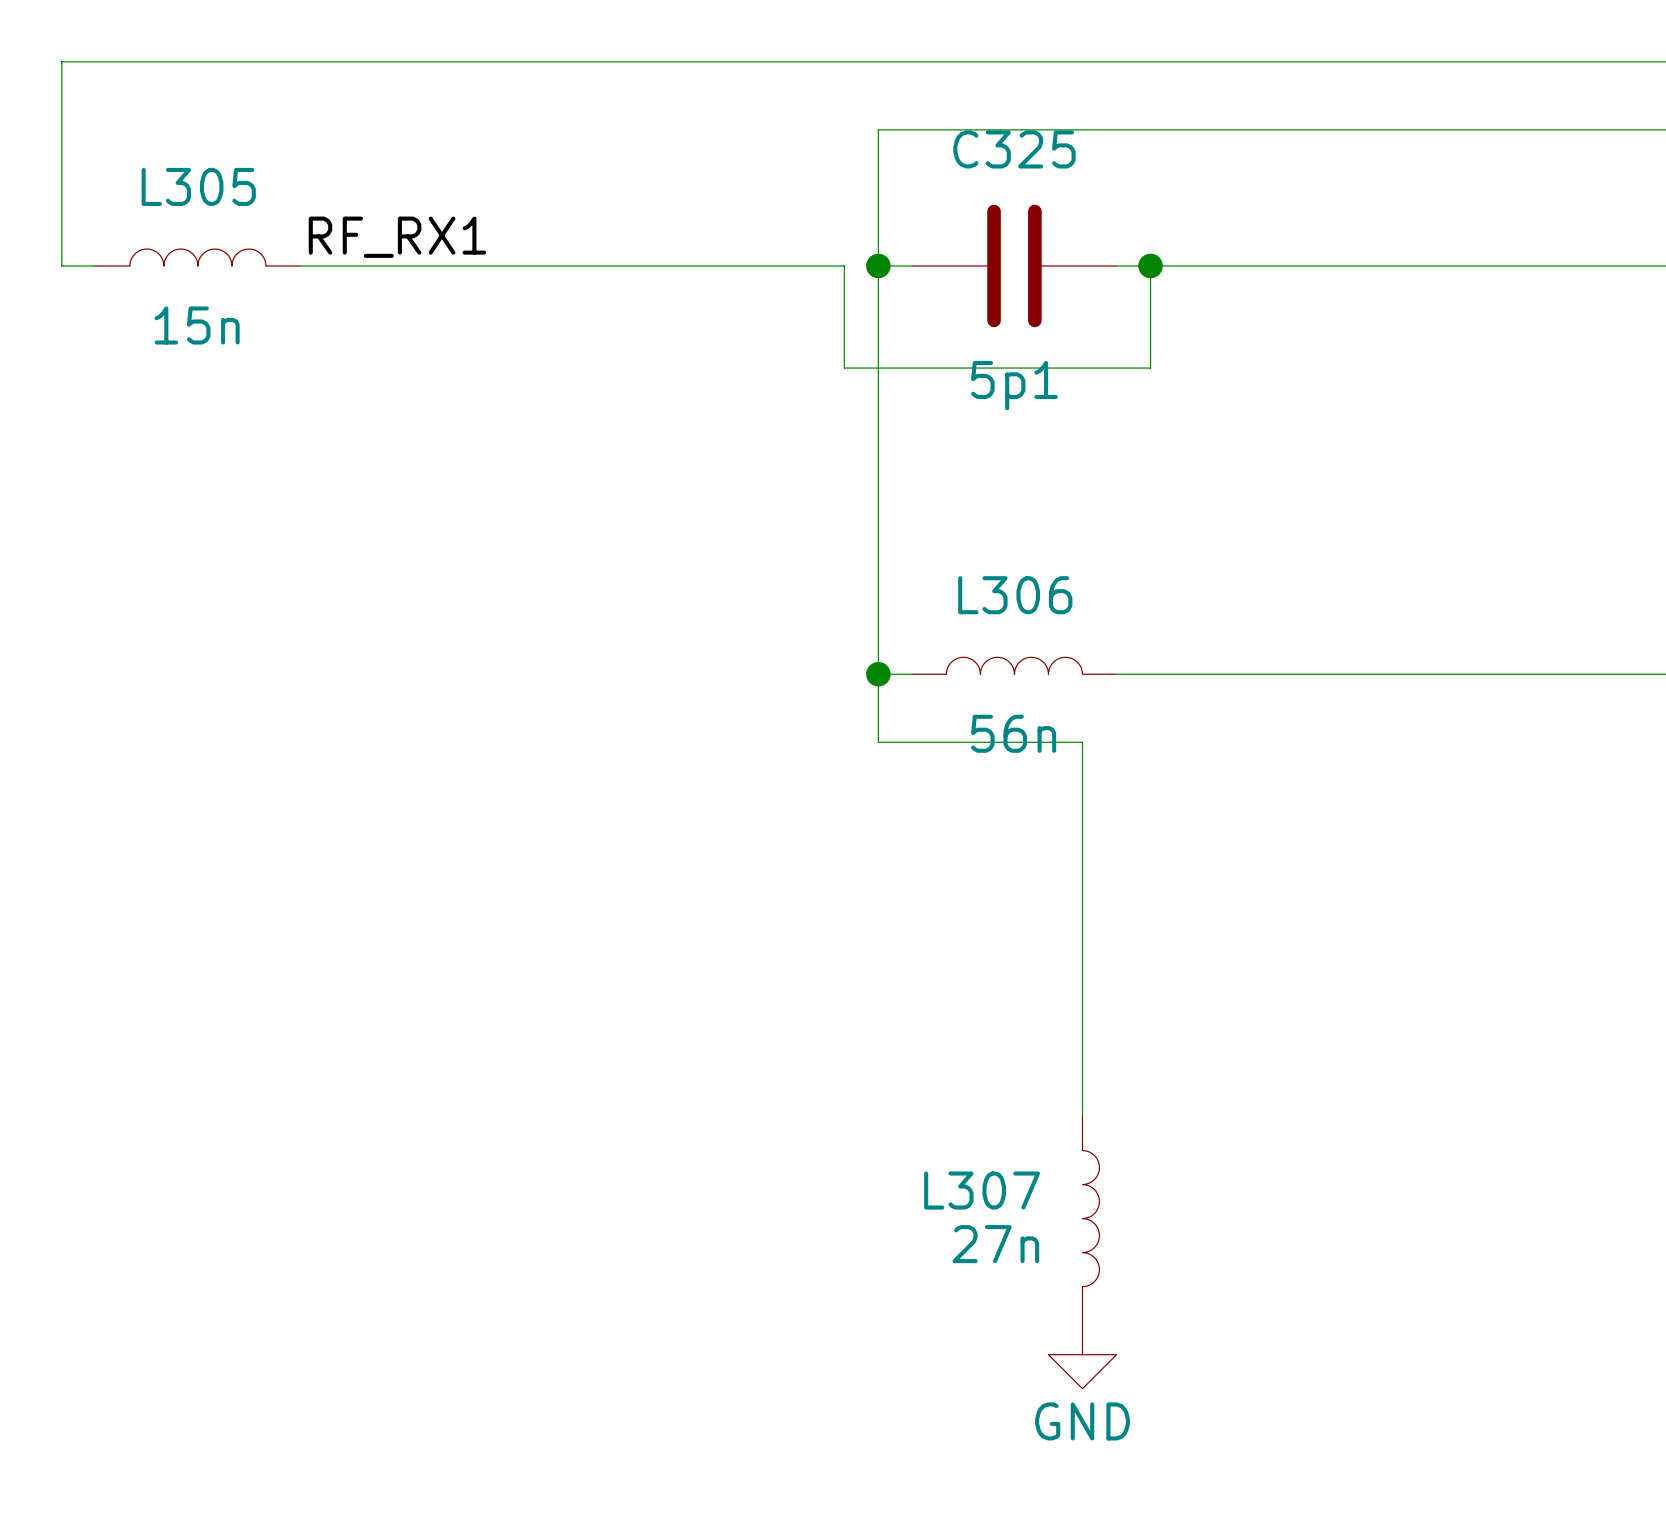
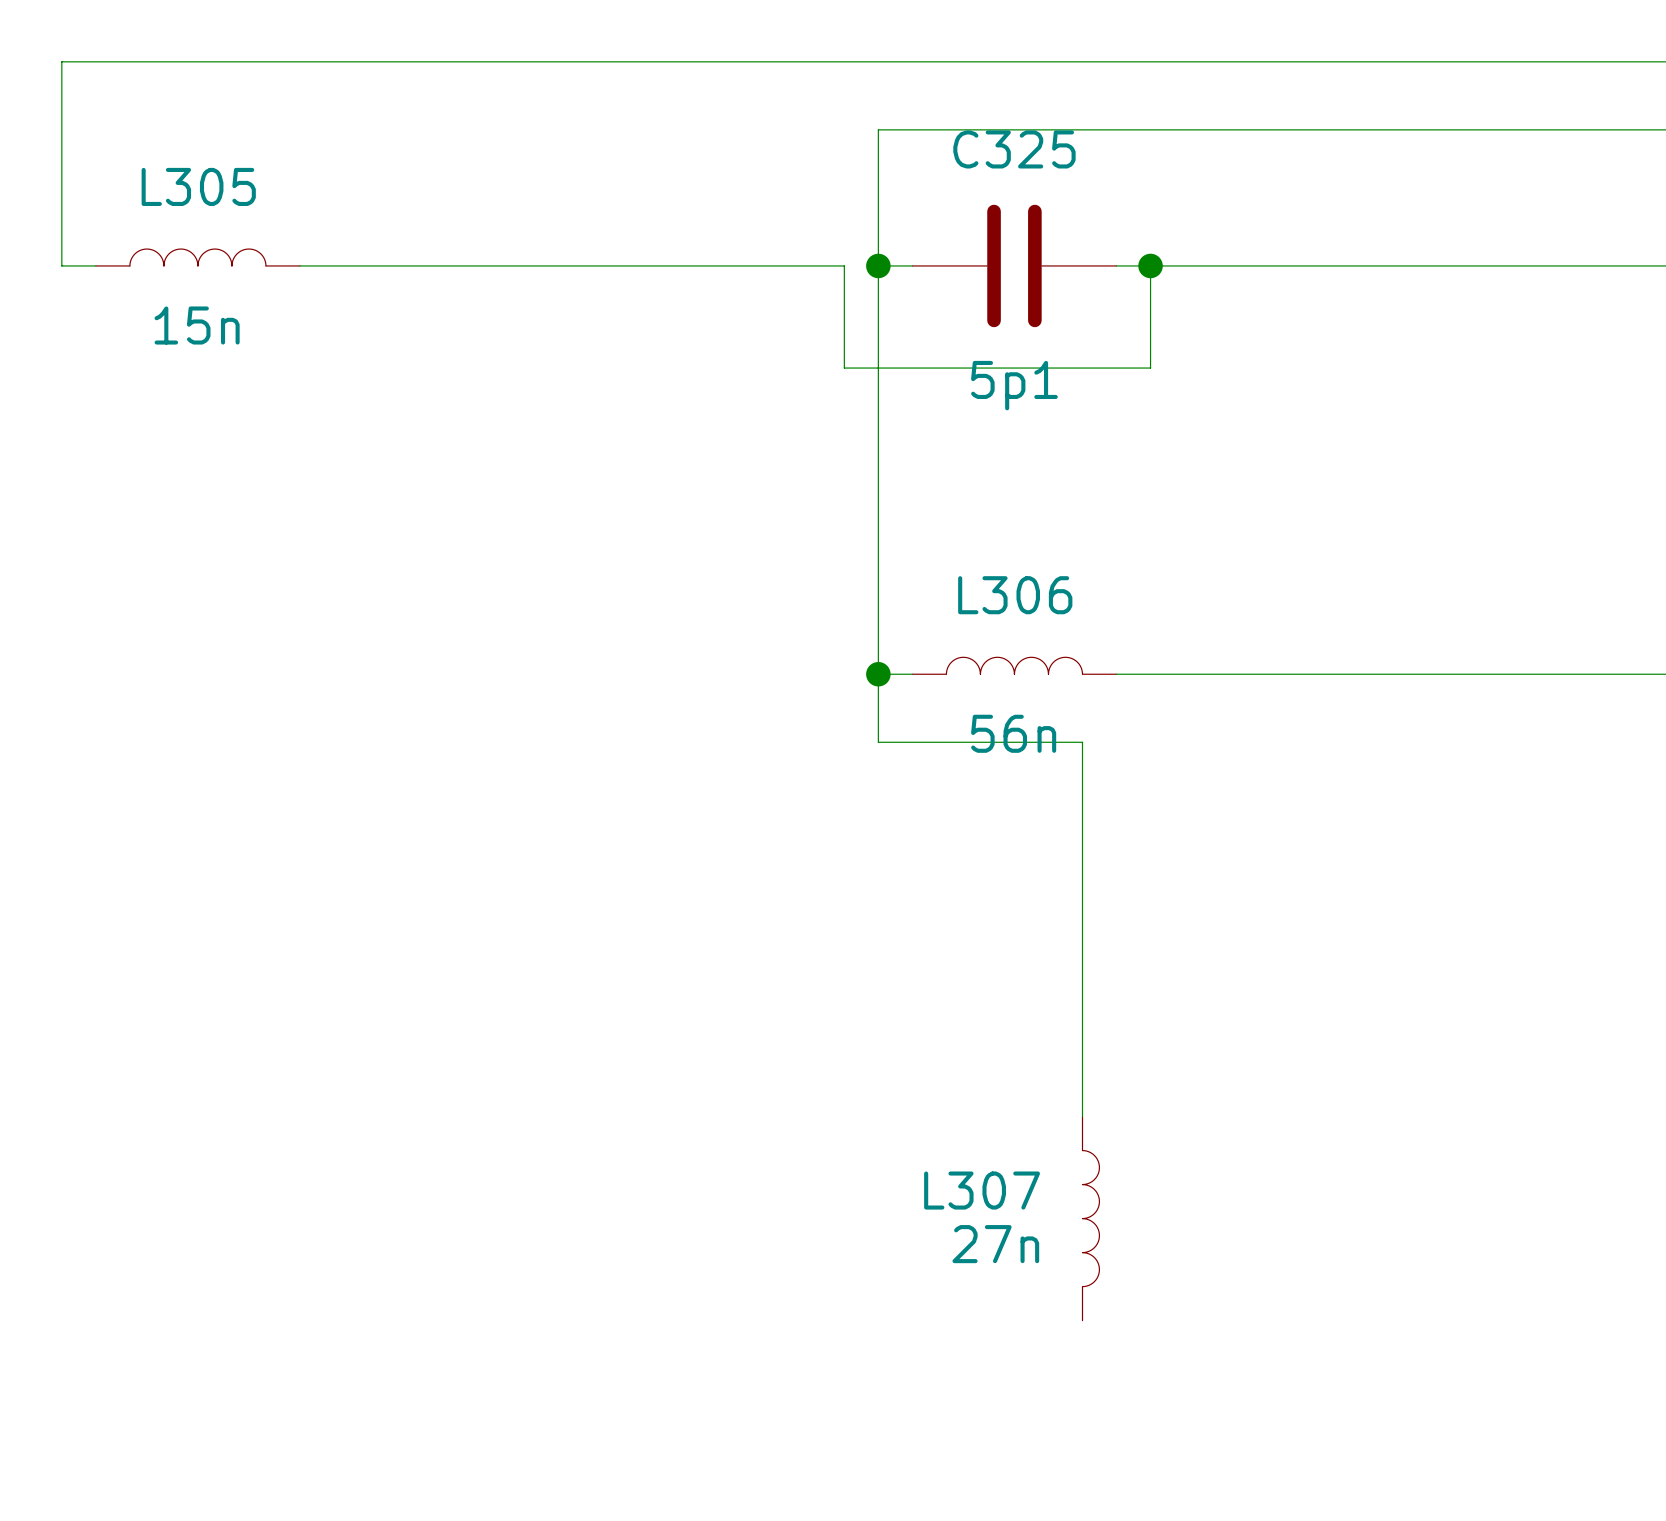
label: RF_RX1 (397, 237) -> none
power symbol: GND (1082, 1354) -> none

